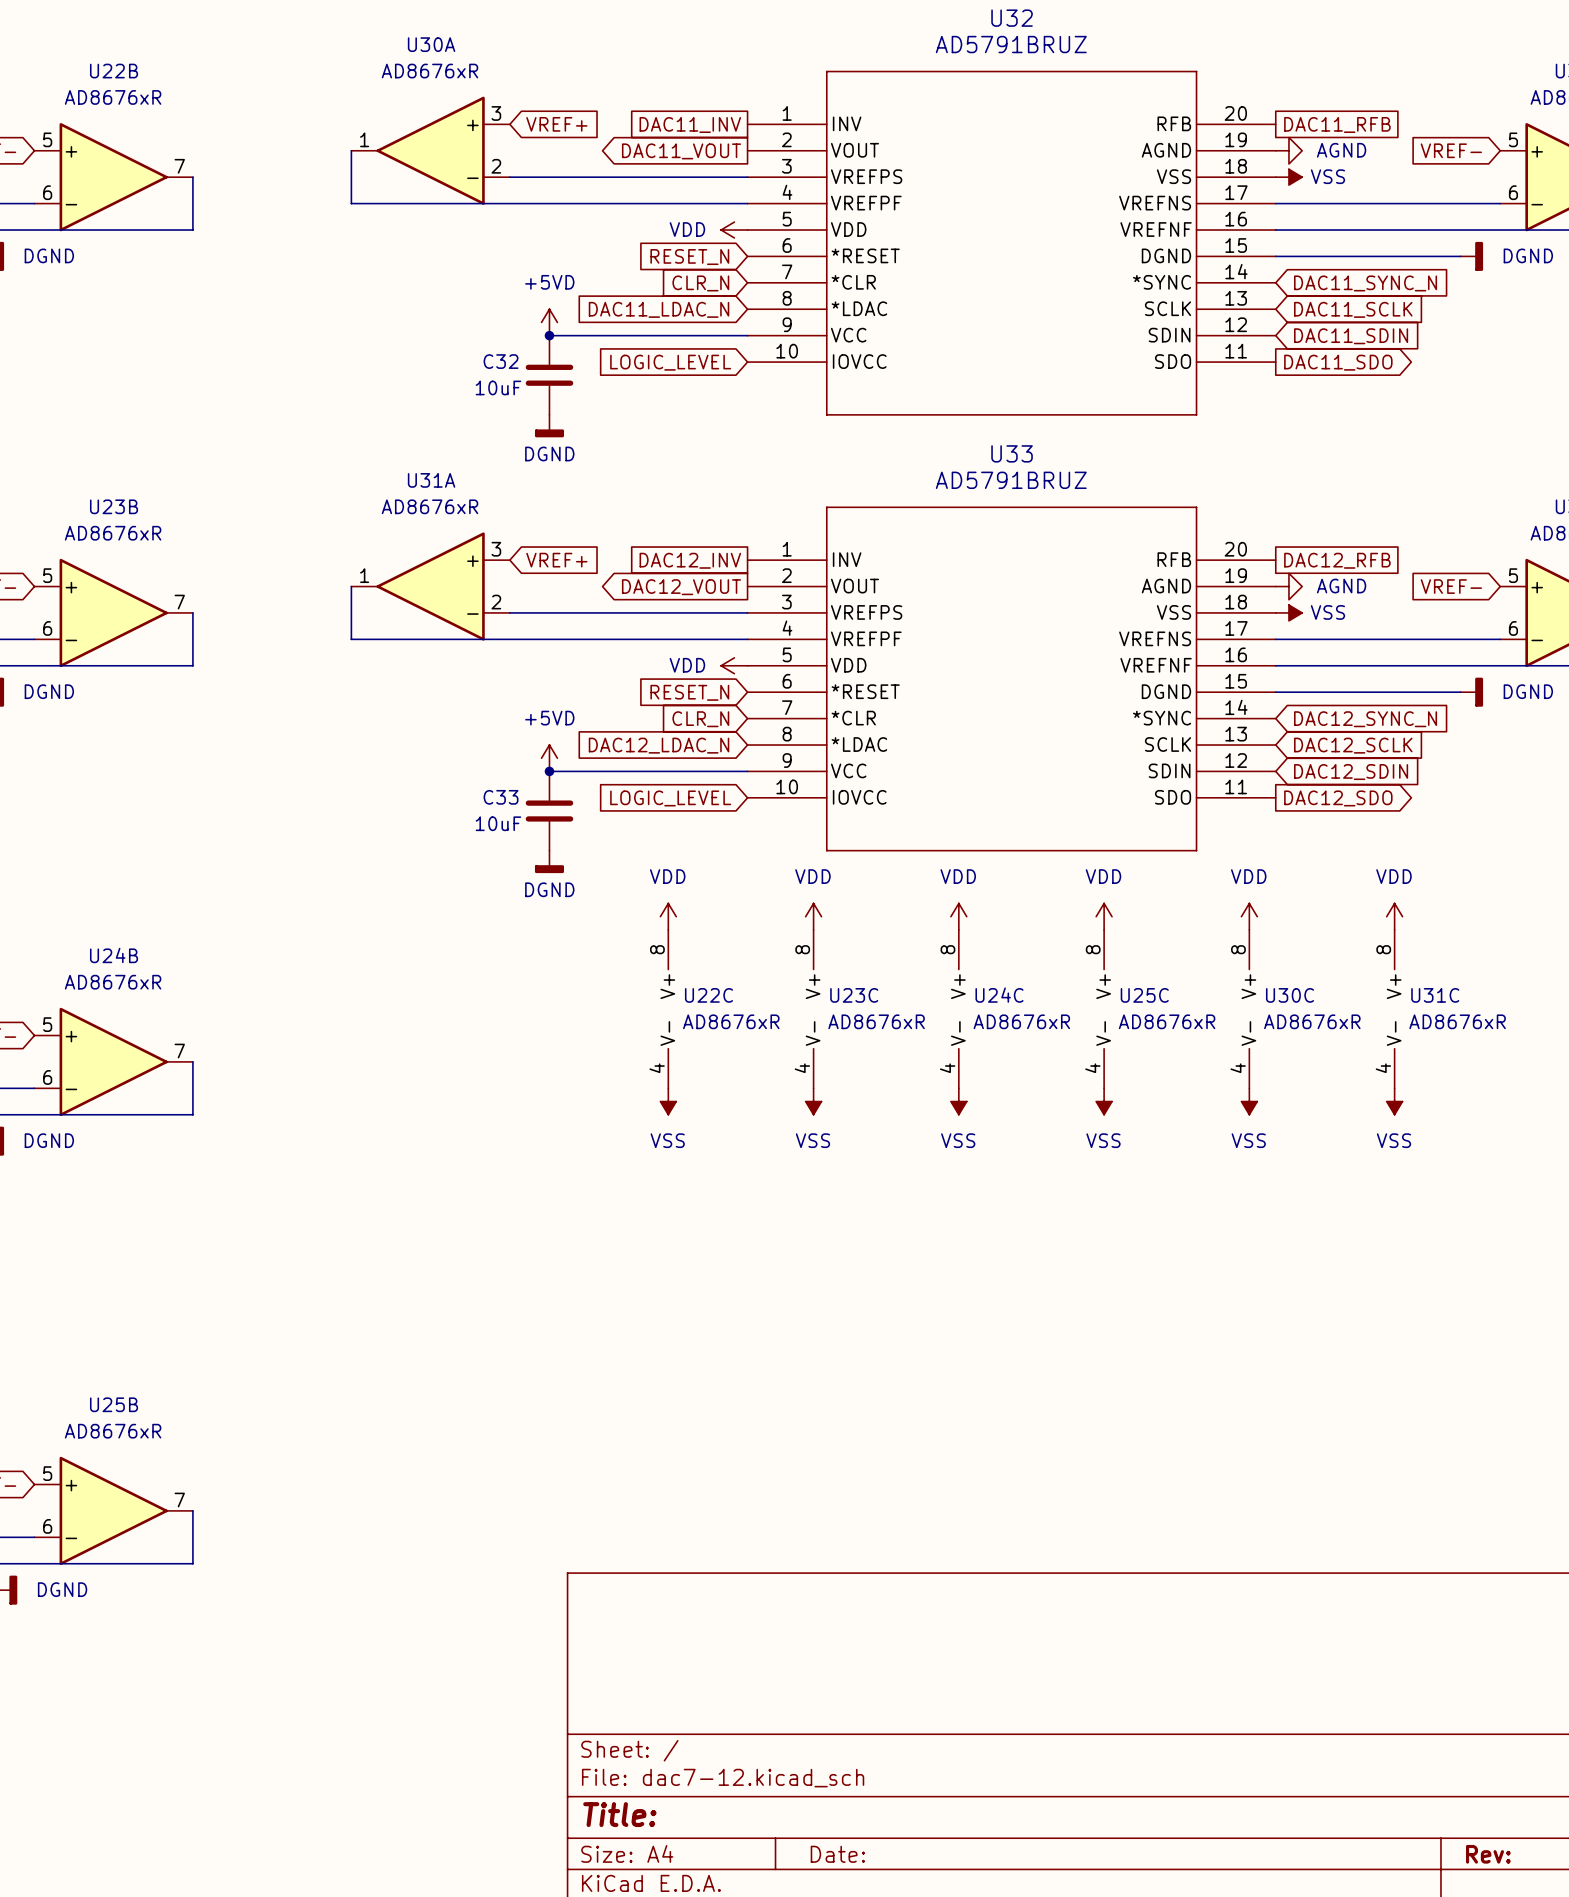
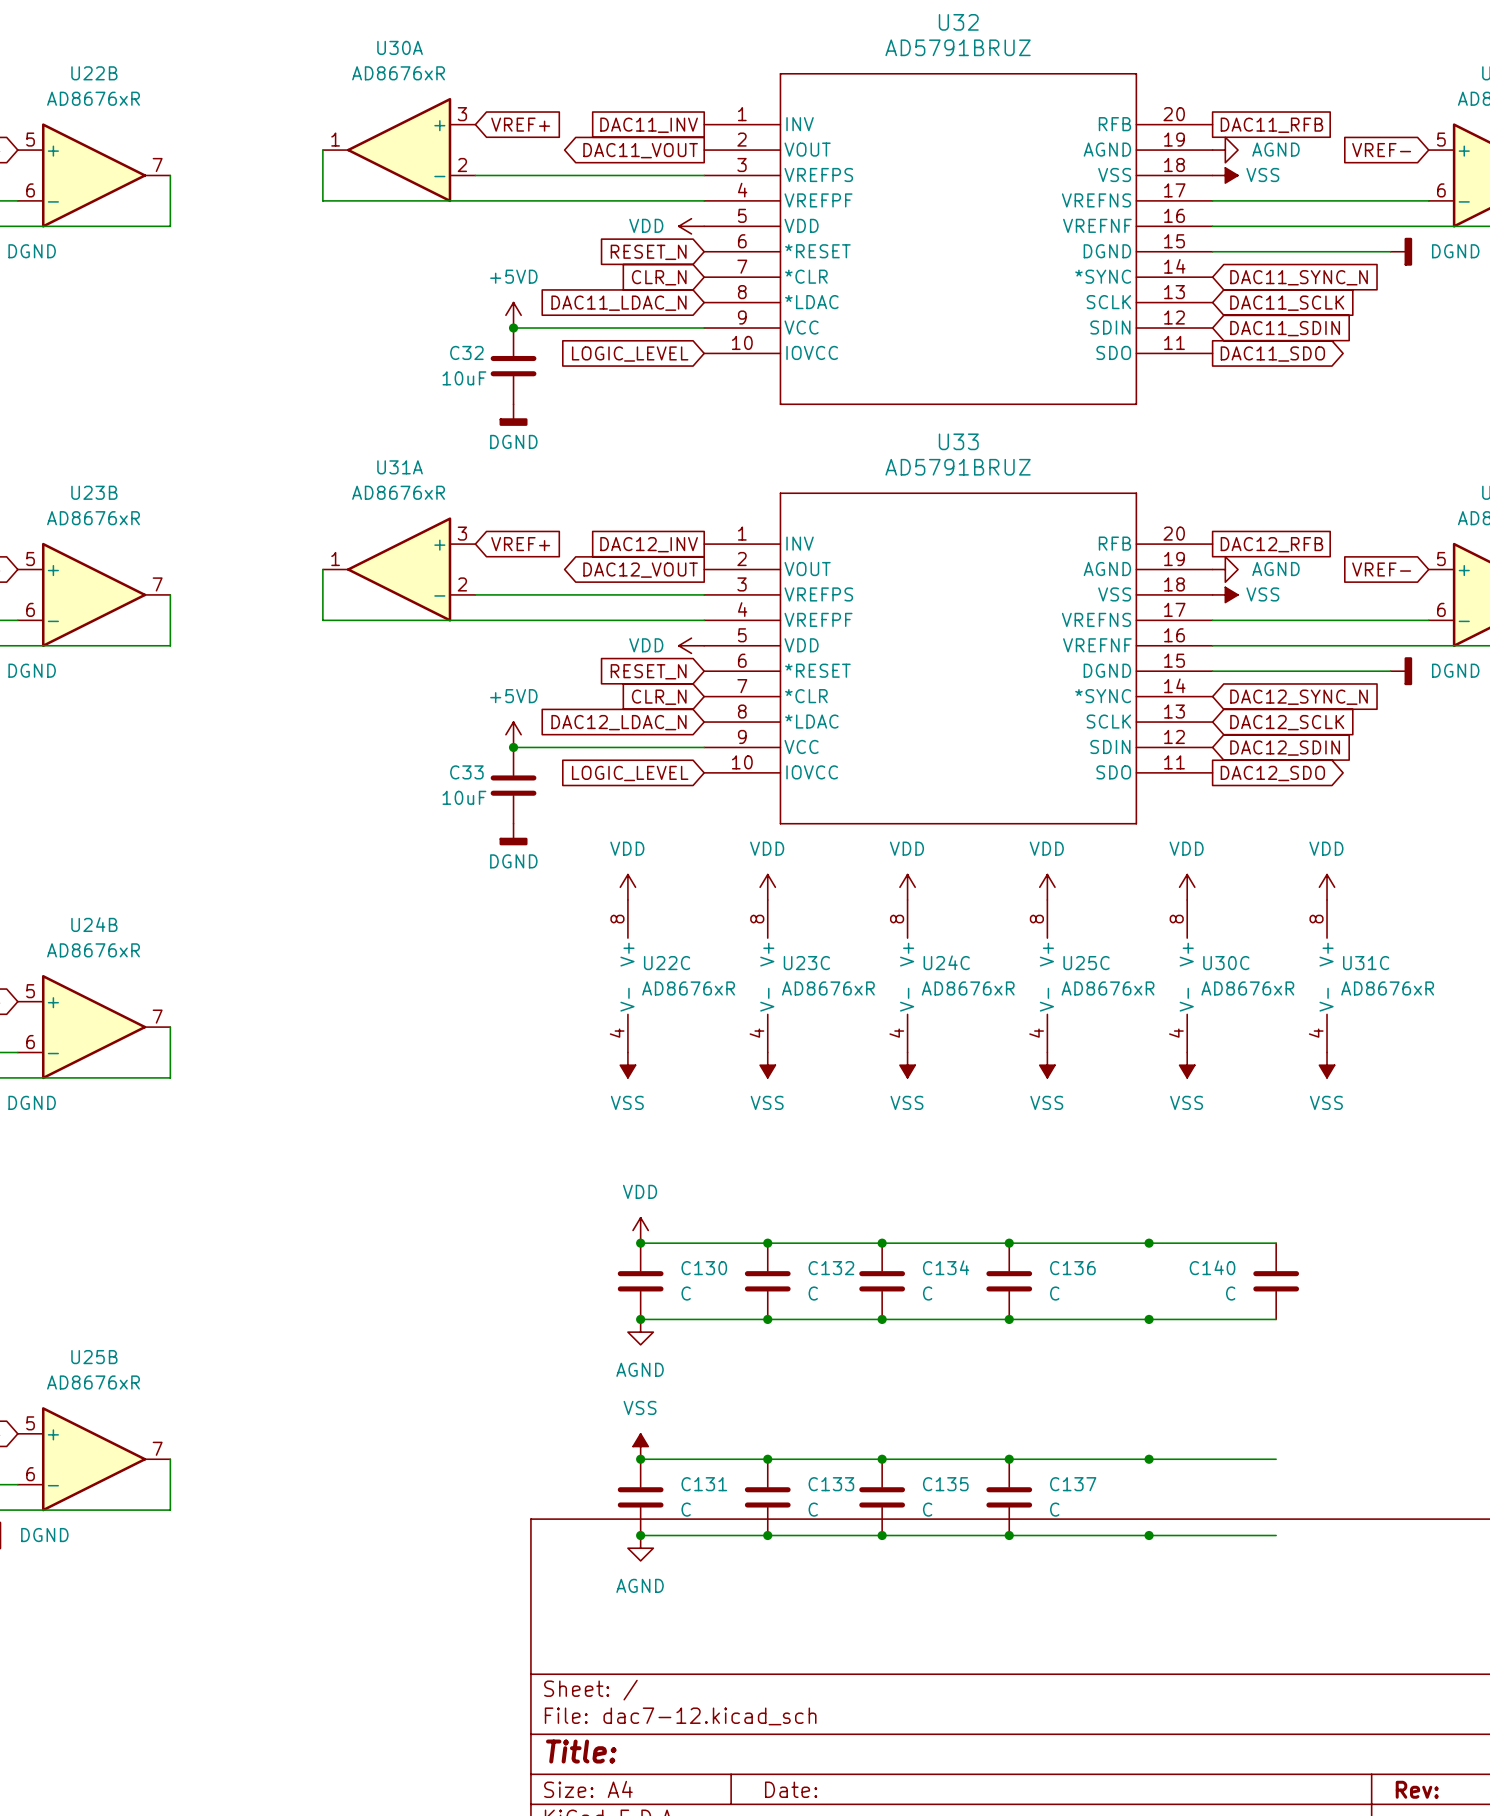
power symbol: none -> VDD (640, 1230)
wire: none -> (640, 1243) (1276, 1243)
junction: none -> (640, 1243)
junction: none -> (767, 1243)
junction: none -> (882, 1243)
junction: none -> (1009, 1243)
junction: none -> (1149, 1243)
C130: none -> C (640, 1281)
C132: none -> C (767, 1281)
C134: none -> C (882, 1281)
C136: none -> C (1009, 1281)
C140: none -> C (1276, 1281)
wire: none -> (640, 1319) (1276, 1319)
junction: none -> (640, 1319)
junction: none -> (767, 1319)
junction: none -> (882, 1319)
junction: none -> (1009, 1319)
junction: none -> (1149, 1319)
power symbol: none -> AGND (640, 1332)
power symbol: none -> VSS (640, 1446)
wire: none -> (640, 1459) (1276, 1459)
junction: none -> (640, 1459)
junction: none -> (767, 1459)
junction: none -> (882, 1459)
junction: none -> (1009, 1459)
junction: none -> (1149, 1459)
C131: none -> C (640, 1497)
C133: none -> C (767, 1497)
C135: none -> C (882, 1497)
C137: none -> C (1009, 1497)
wire: none -> (640, 1535) (1276, 1535)
junction: none -> (640, 1535)
junction: none -> (767, 1535)
junction: none -> (882, 1535)
junction: none -> (1009, 1535)
junction: none -> (1149, 1535)
power symbol: none -> AGND (640, 1548)

